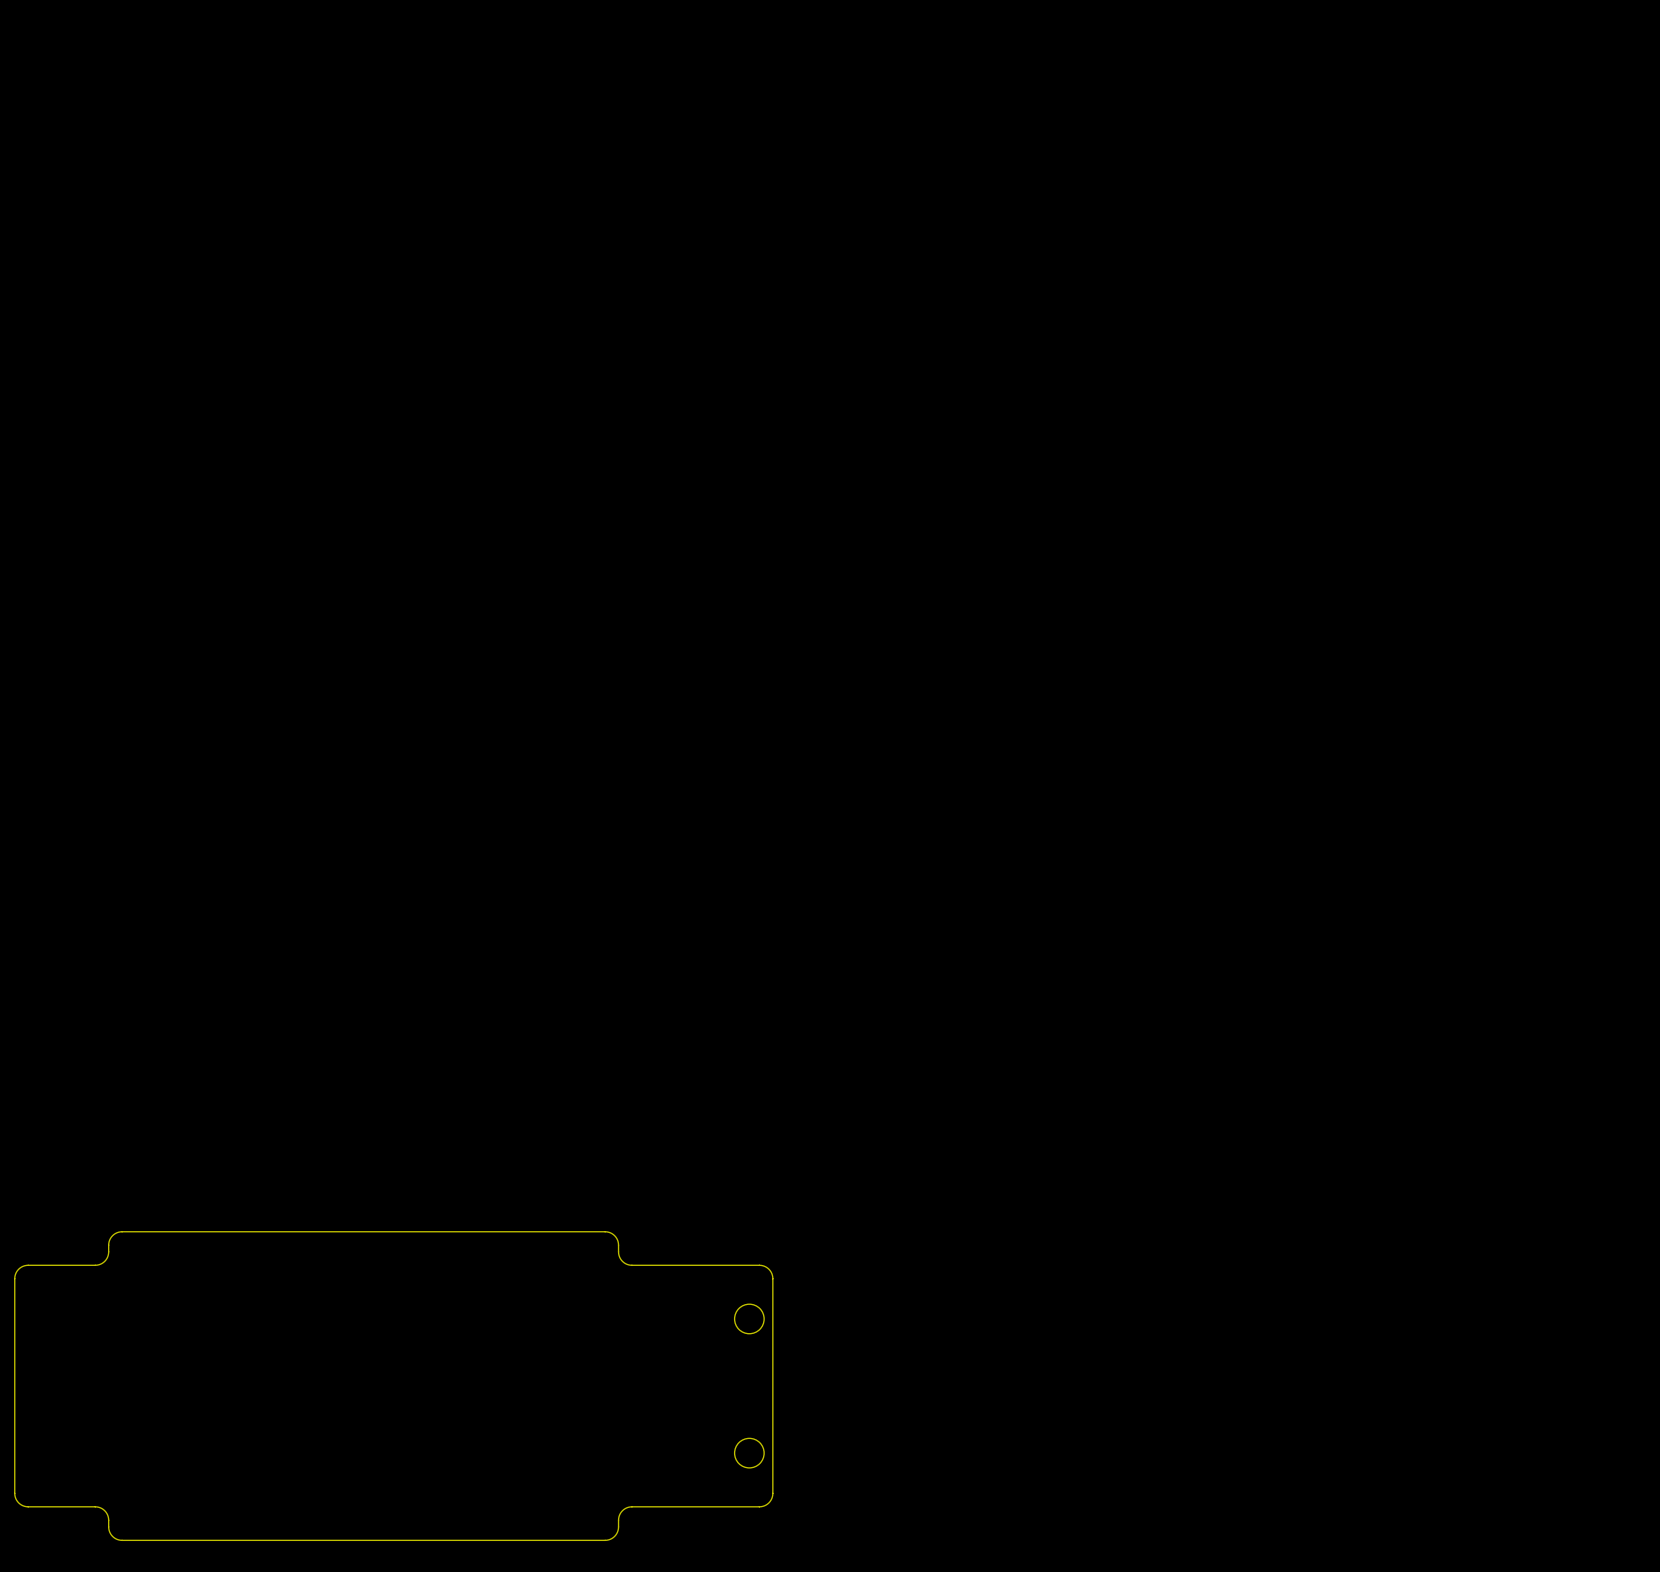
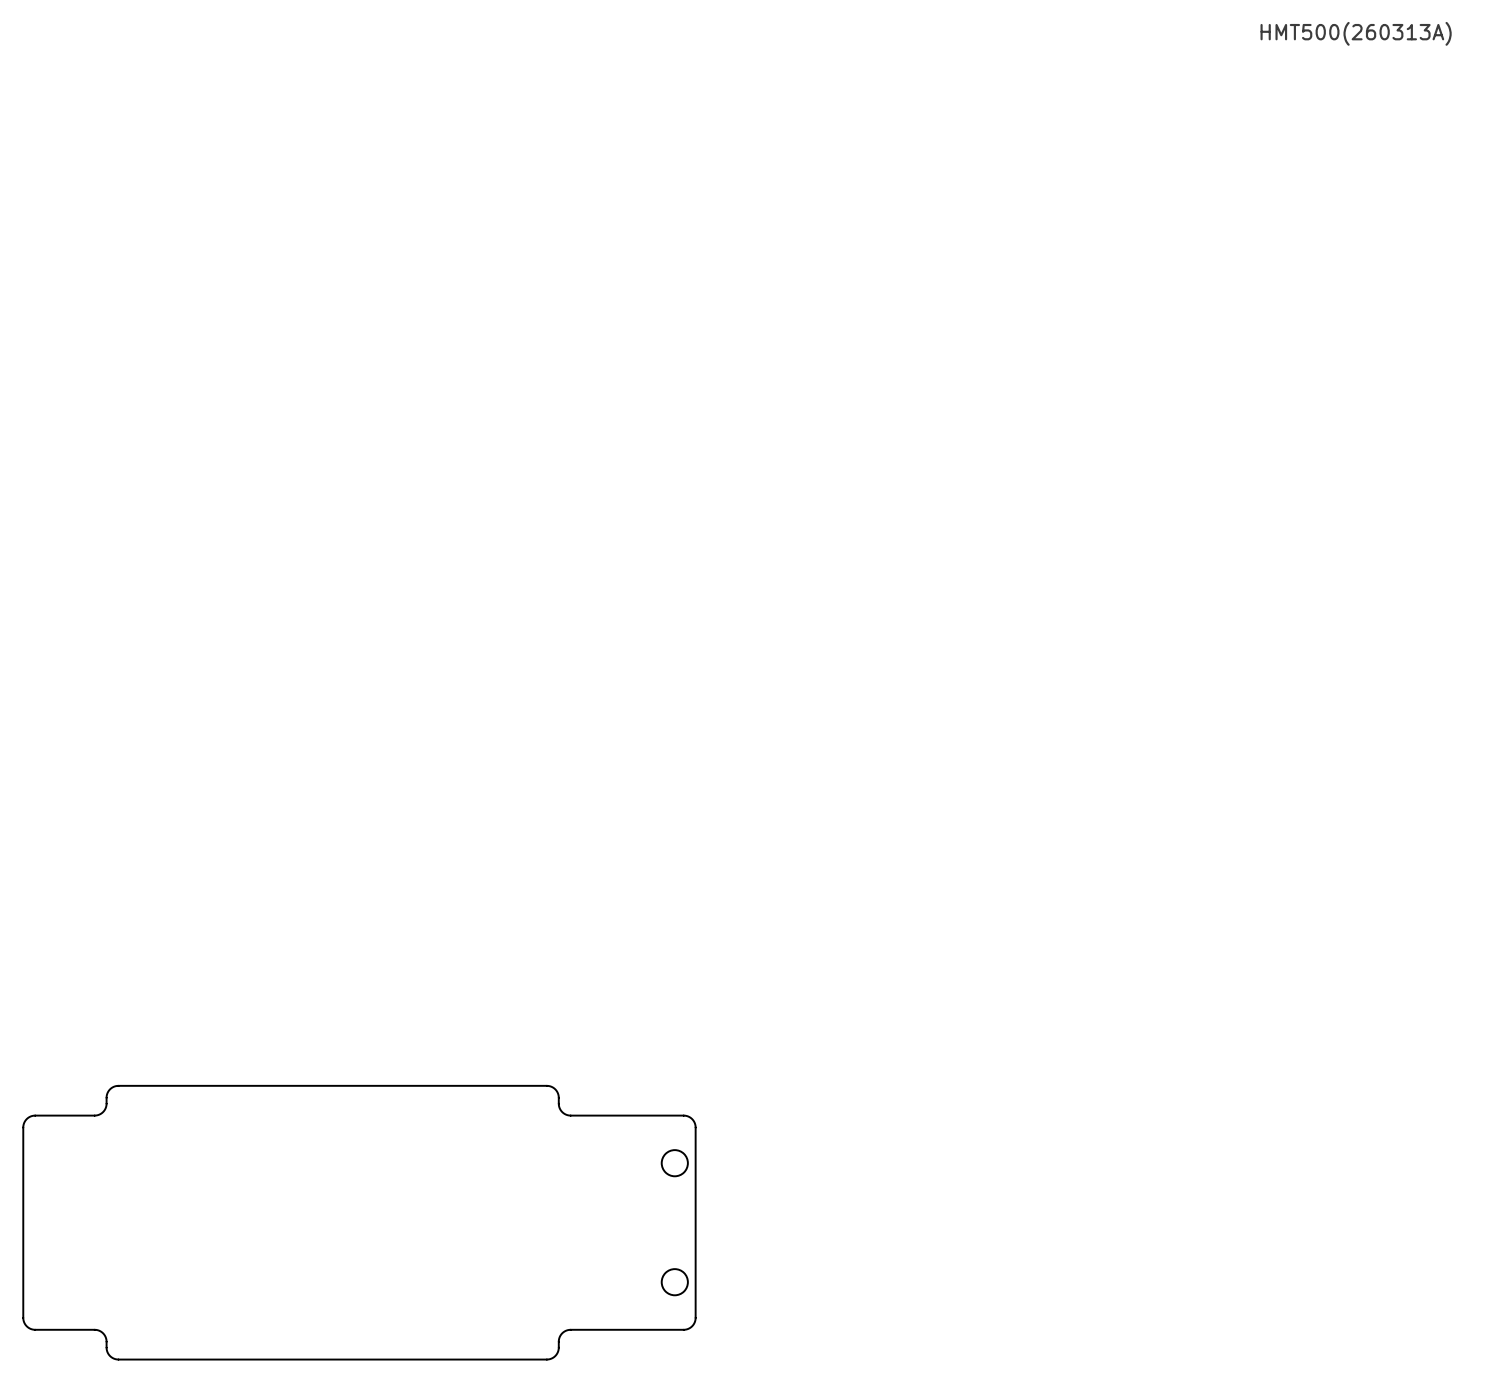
text: none -> HMT500(260313A) (1356, 33)

